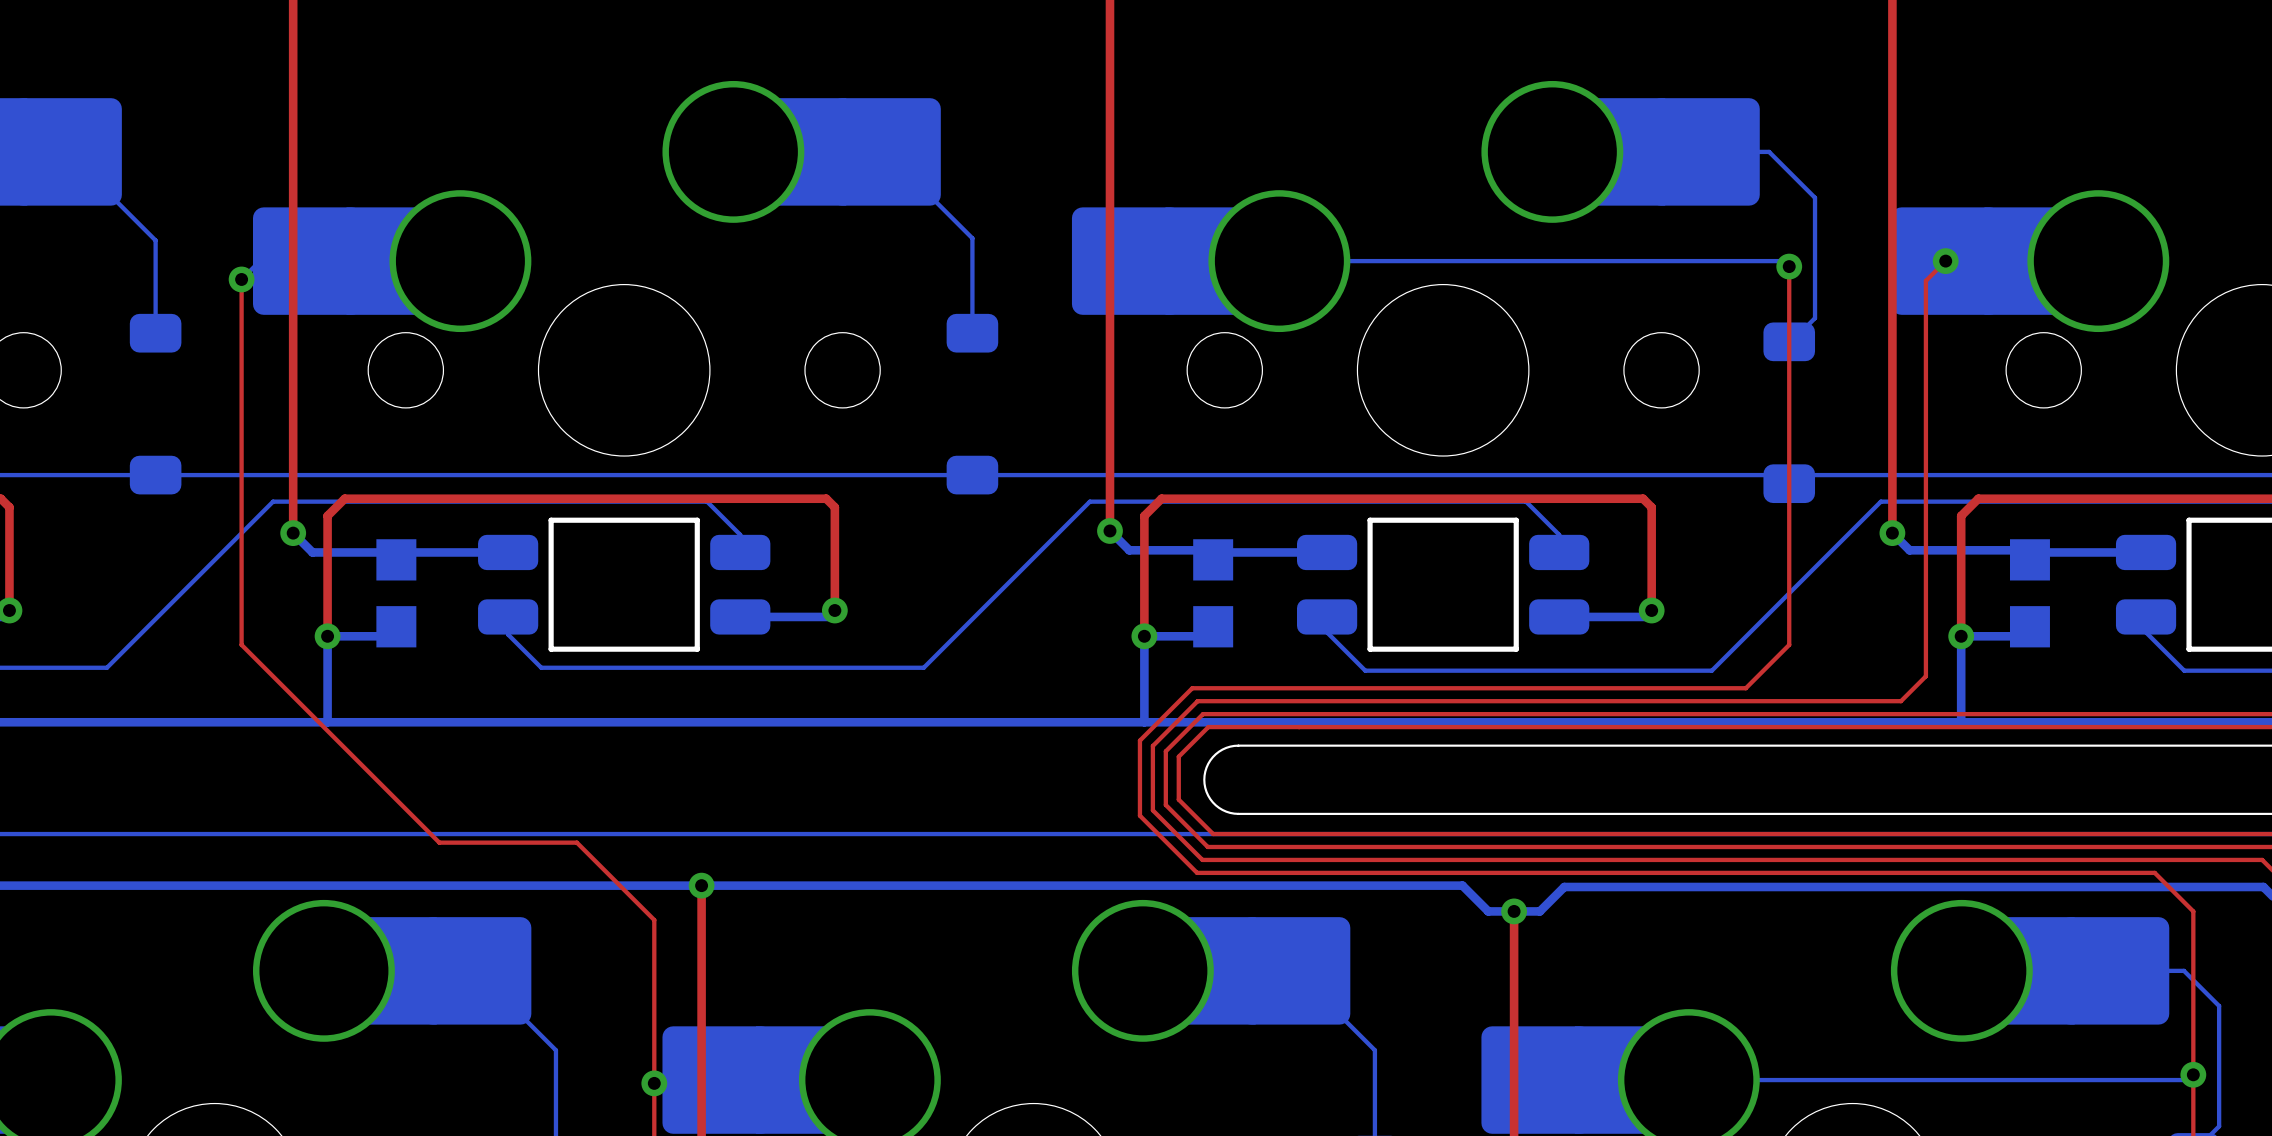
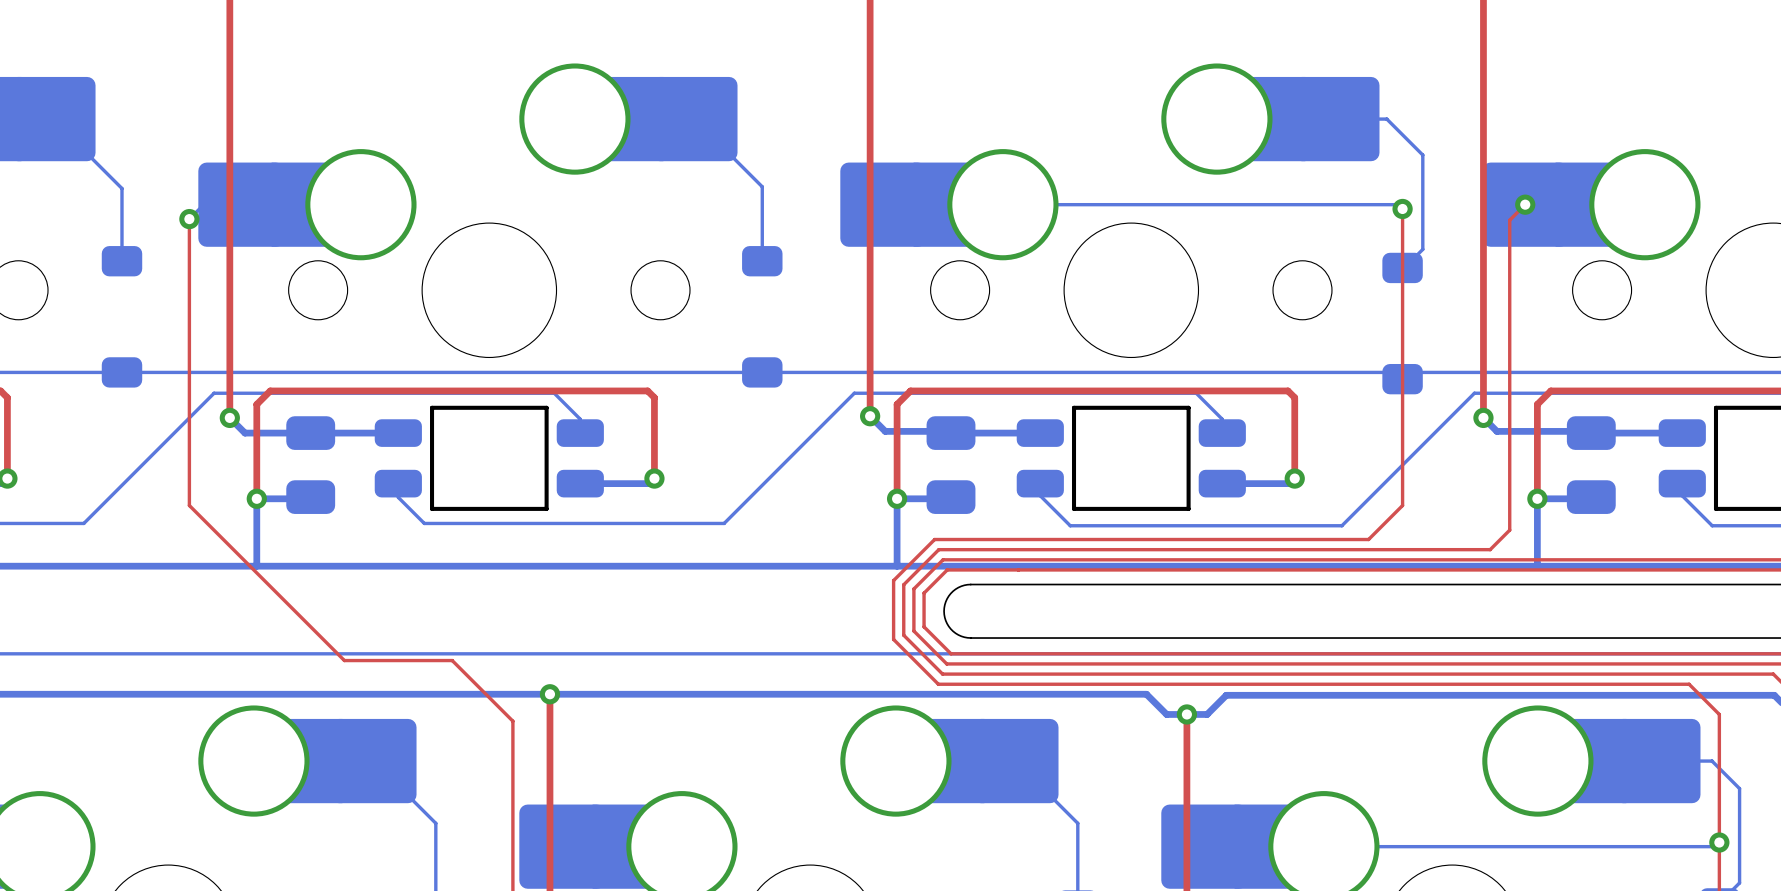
part footprint: [376, 539, 417, 648] -> [286, 416, 336, 514]
part footprint: [1193, 539, 1234, 648] -> [926, 416, 976, 514]
part footprint: [2009, 539, 2050, 648] -> [1566, 416, 1616, 514]
via: (654, 1083) -> none

